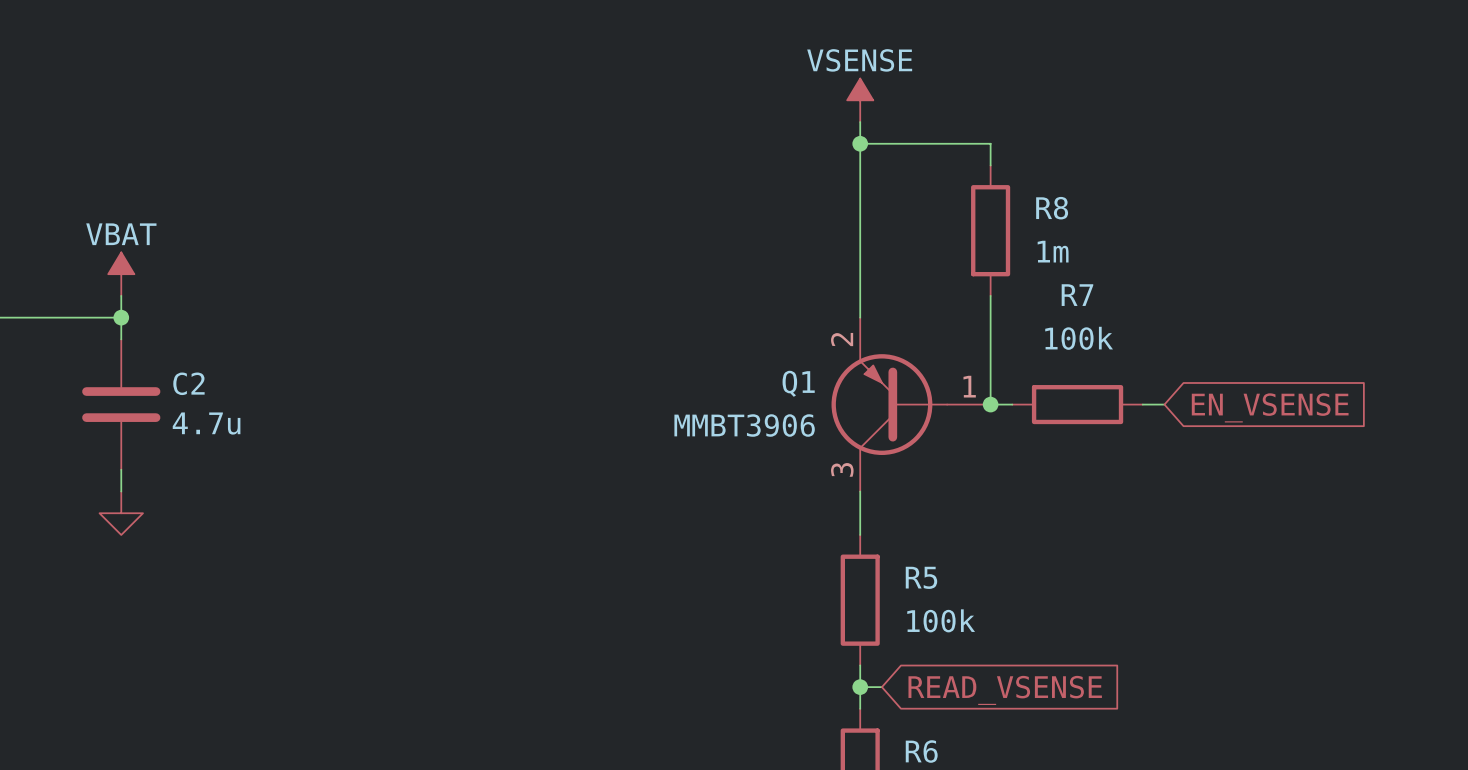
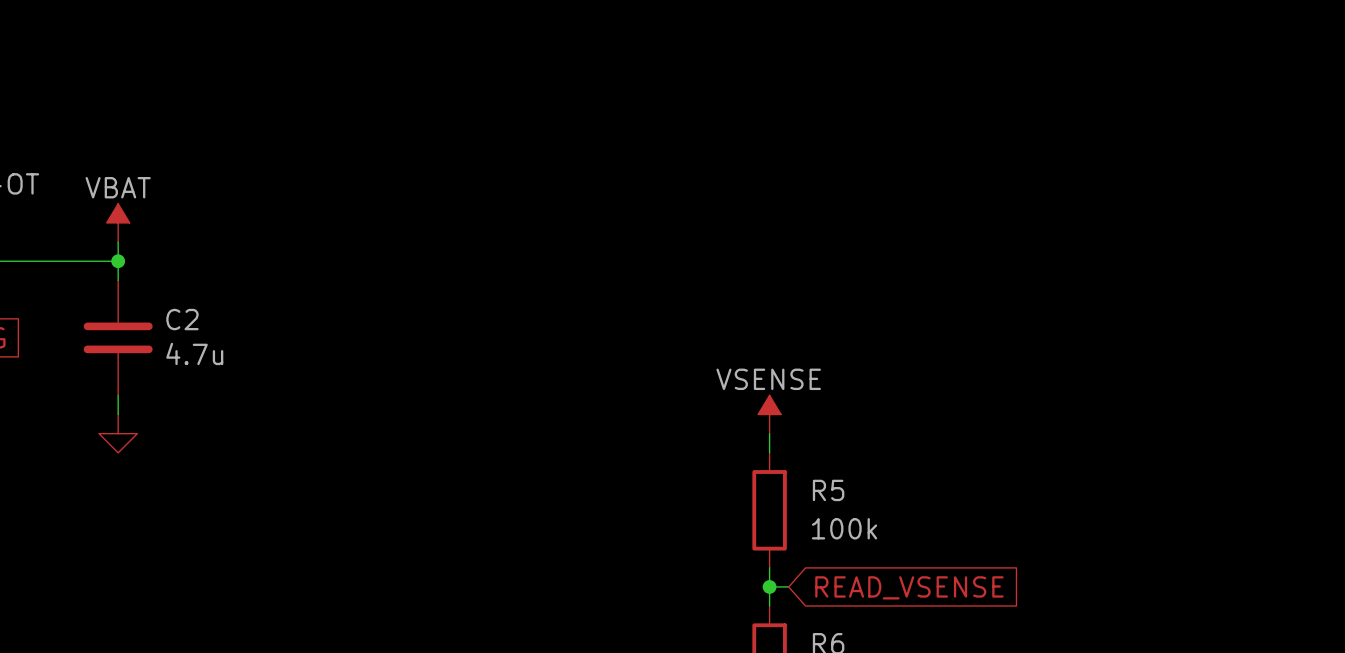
power symbol position: VSENSE (860, 100) -> VSENSE (769, 414)
wire: (860, 122) (860, 317) -> none
wire: (860, 143) (990, 143) (990, 165) -> none
junction: (860, 143) -> none
R8: 1m (990, 230) -> none
wire: (990, 295) (990, 404) (1012, 404) -> none
Q1: MMBT3906 (911, 404) -> none
junction: (990, 404) -> none
R7: 100k (1077, 404) -> none
wire: (1142, 404) (1164, 404) -> none
global label: EN_VSENSE (1270, 407) -> none

